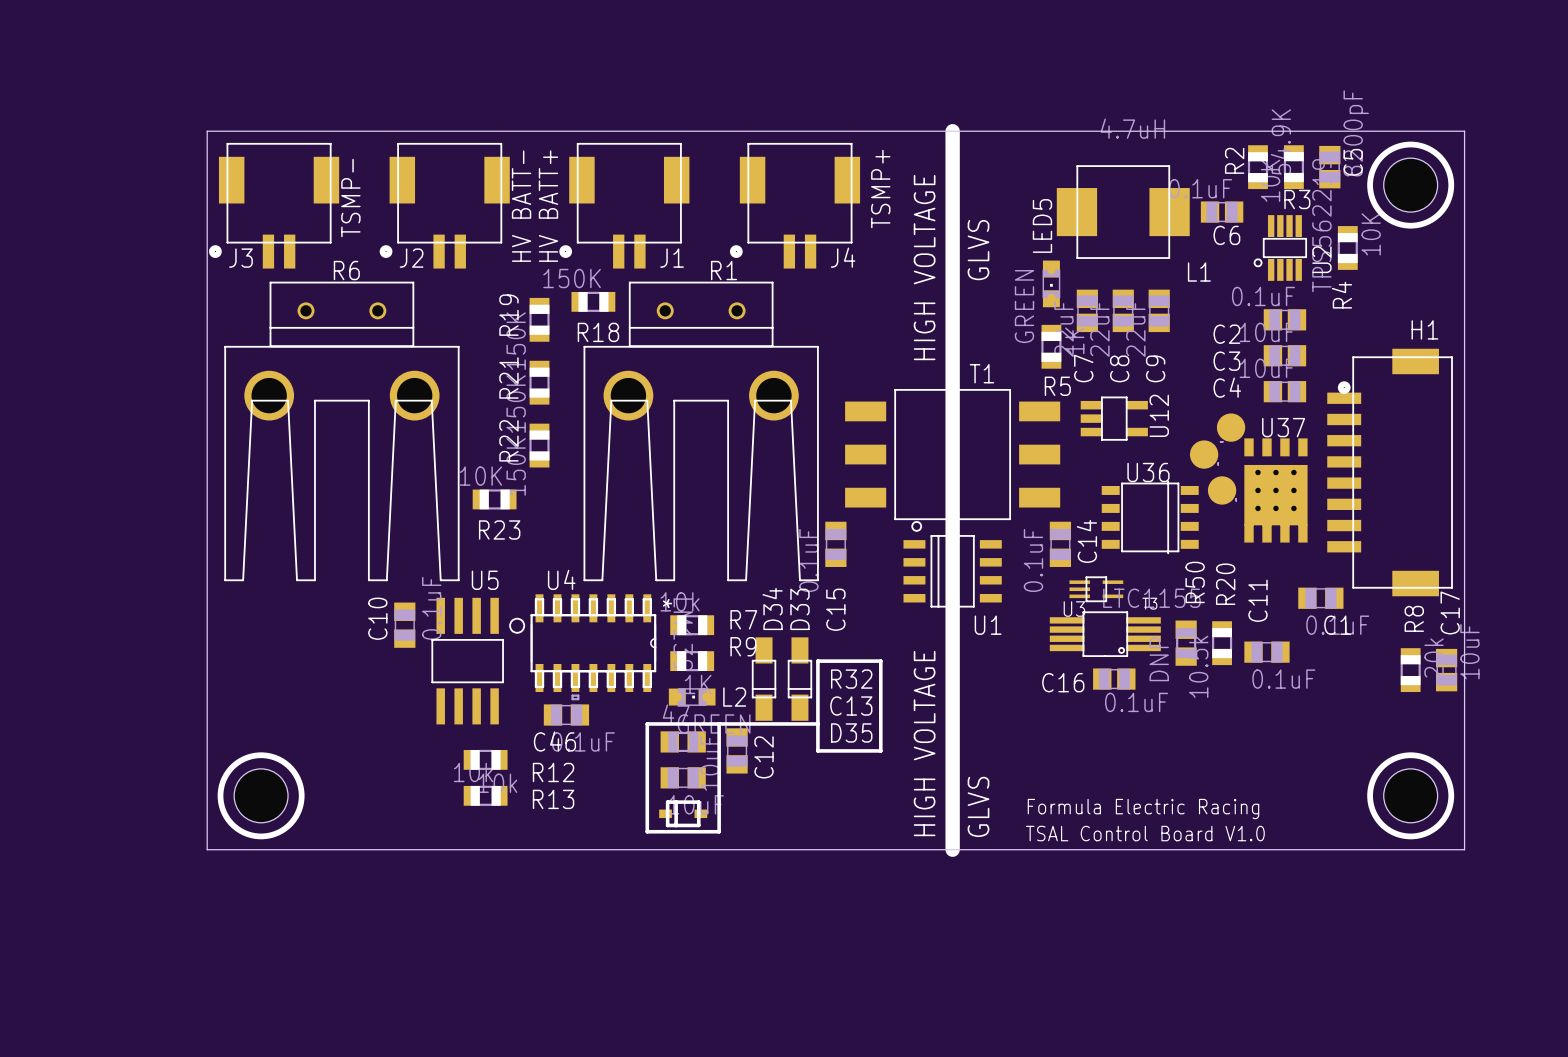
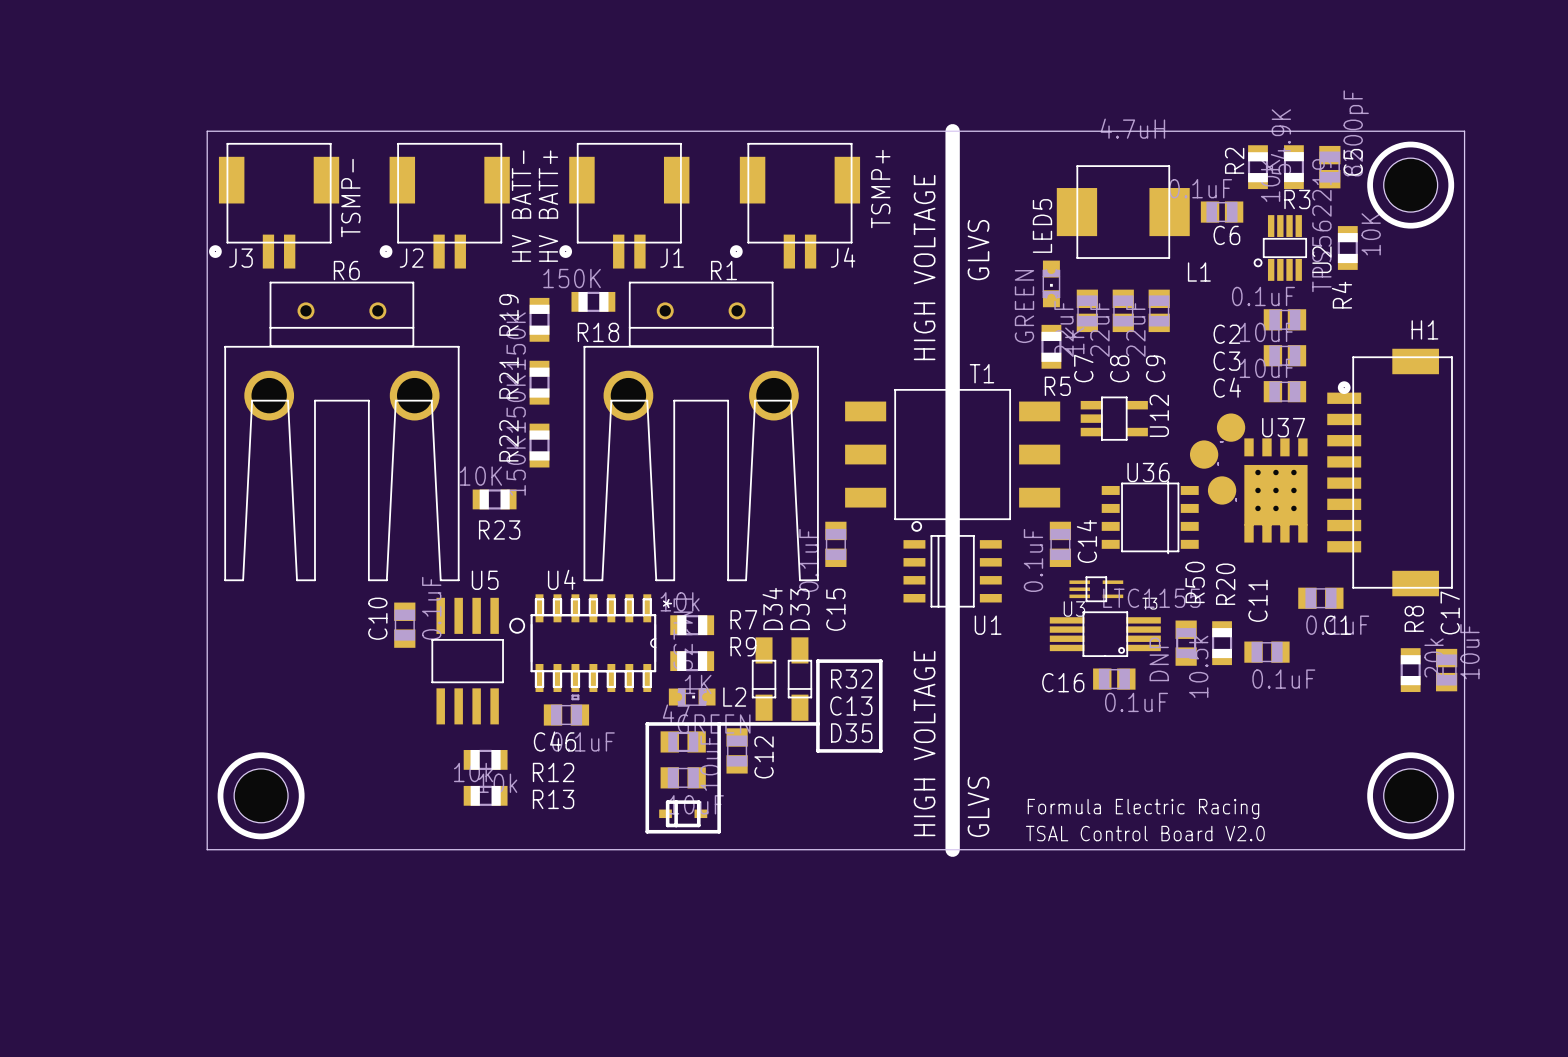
text: TSAL Control Board V1.0 (1145, 833) -> TSAL Control Board V2.0 (1145, 833)

